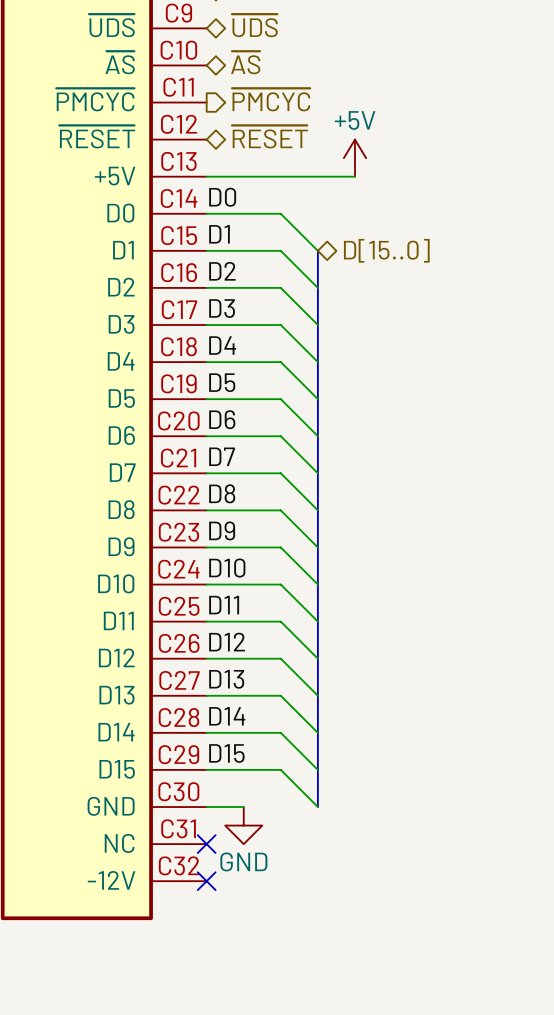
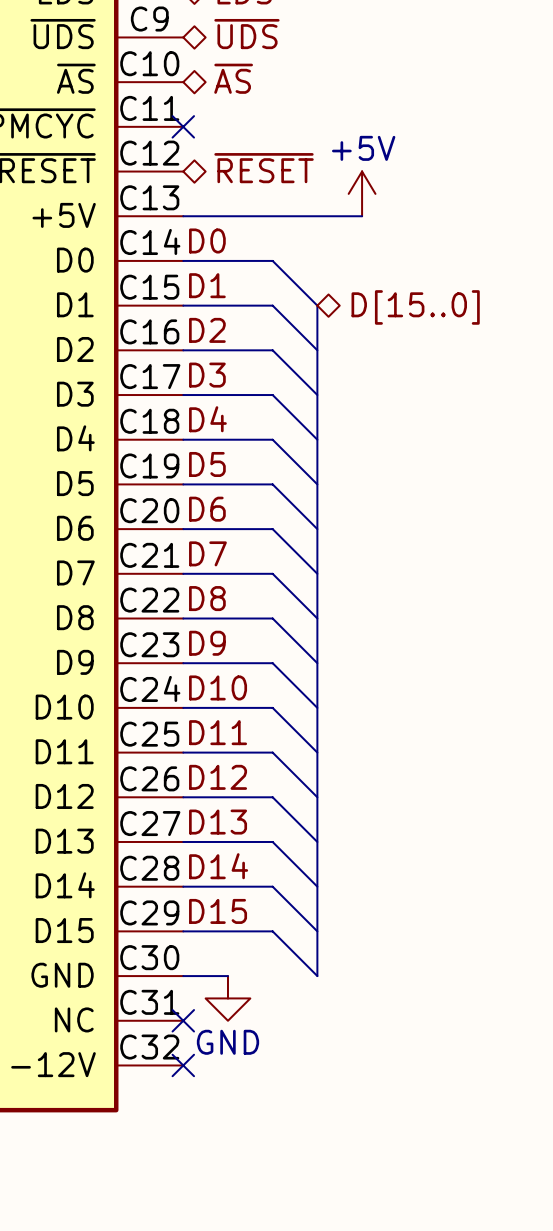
hierarchical label: ~{PMCYC} (271, 99) -> none
no-connect mark: none -> (183, 126)

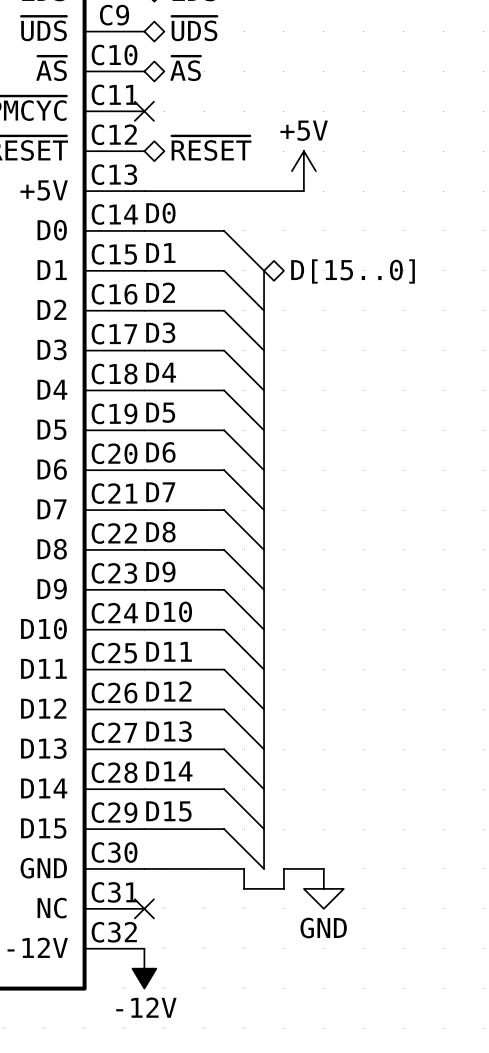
wire: none -> (184, 868) (244, 868) (244, 888) (283, 888) (283, 868) (323, 868)
power symbol position: GND (227, 998) -> GND (323, 888)
no-connect mark: (183, 1065) -> none
power symbol: none -> -12V (144, 968)

